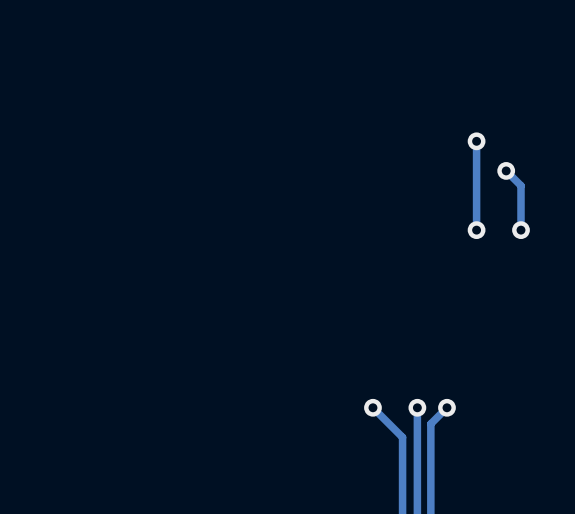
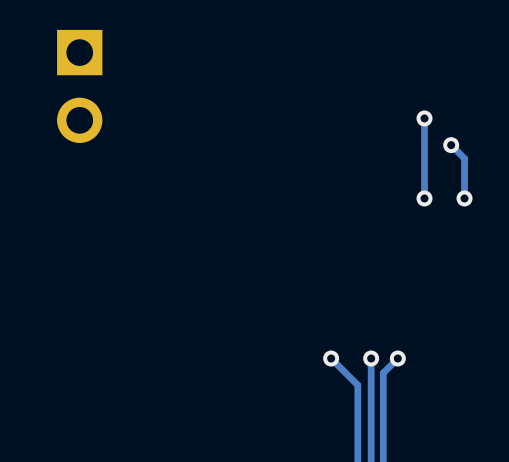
part: none -> (79, 86)

